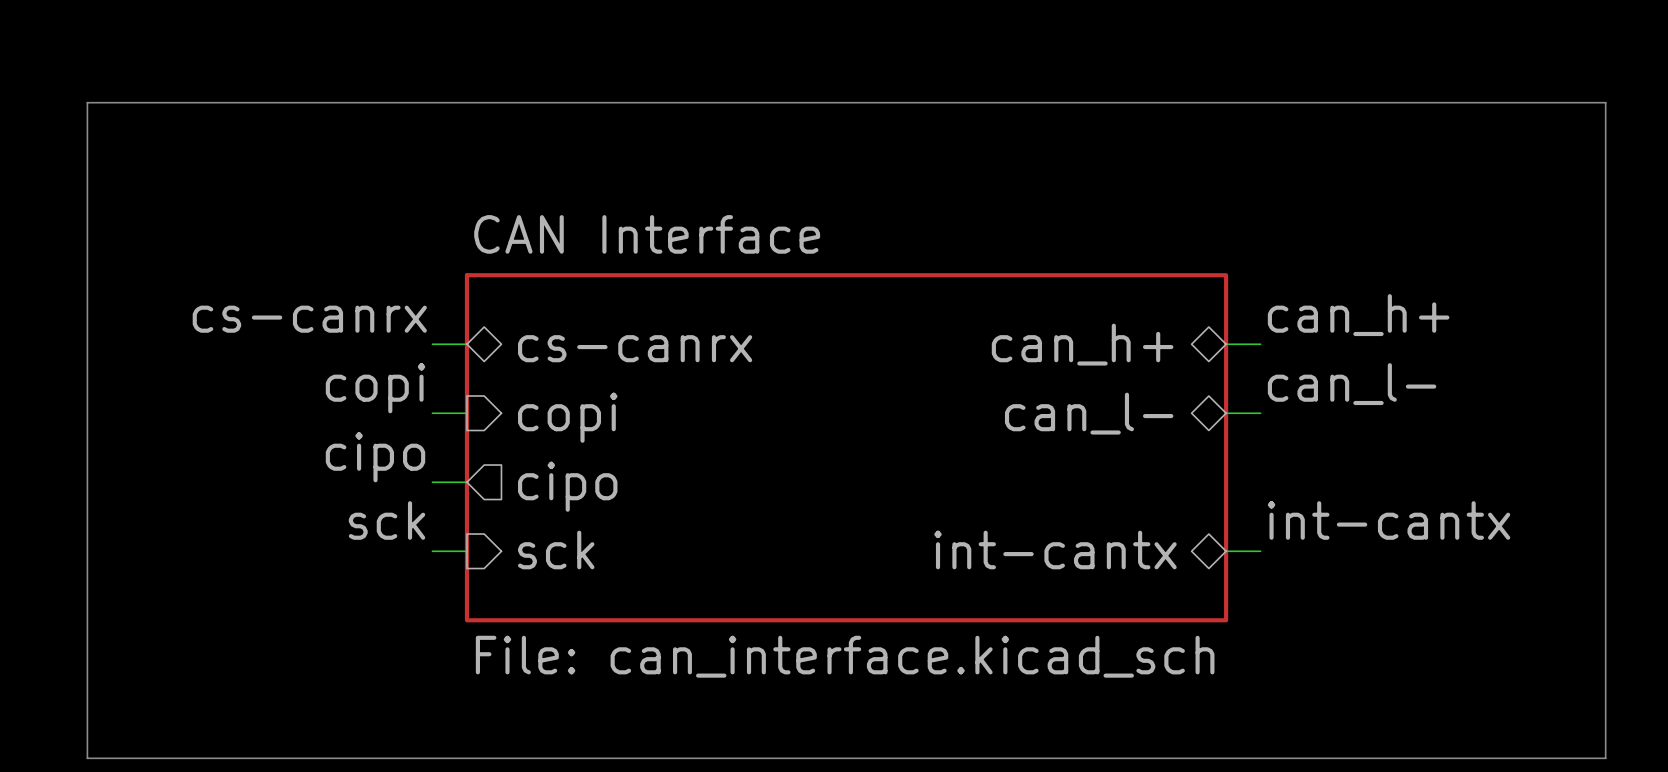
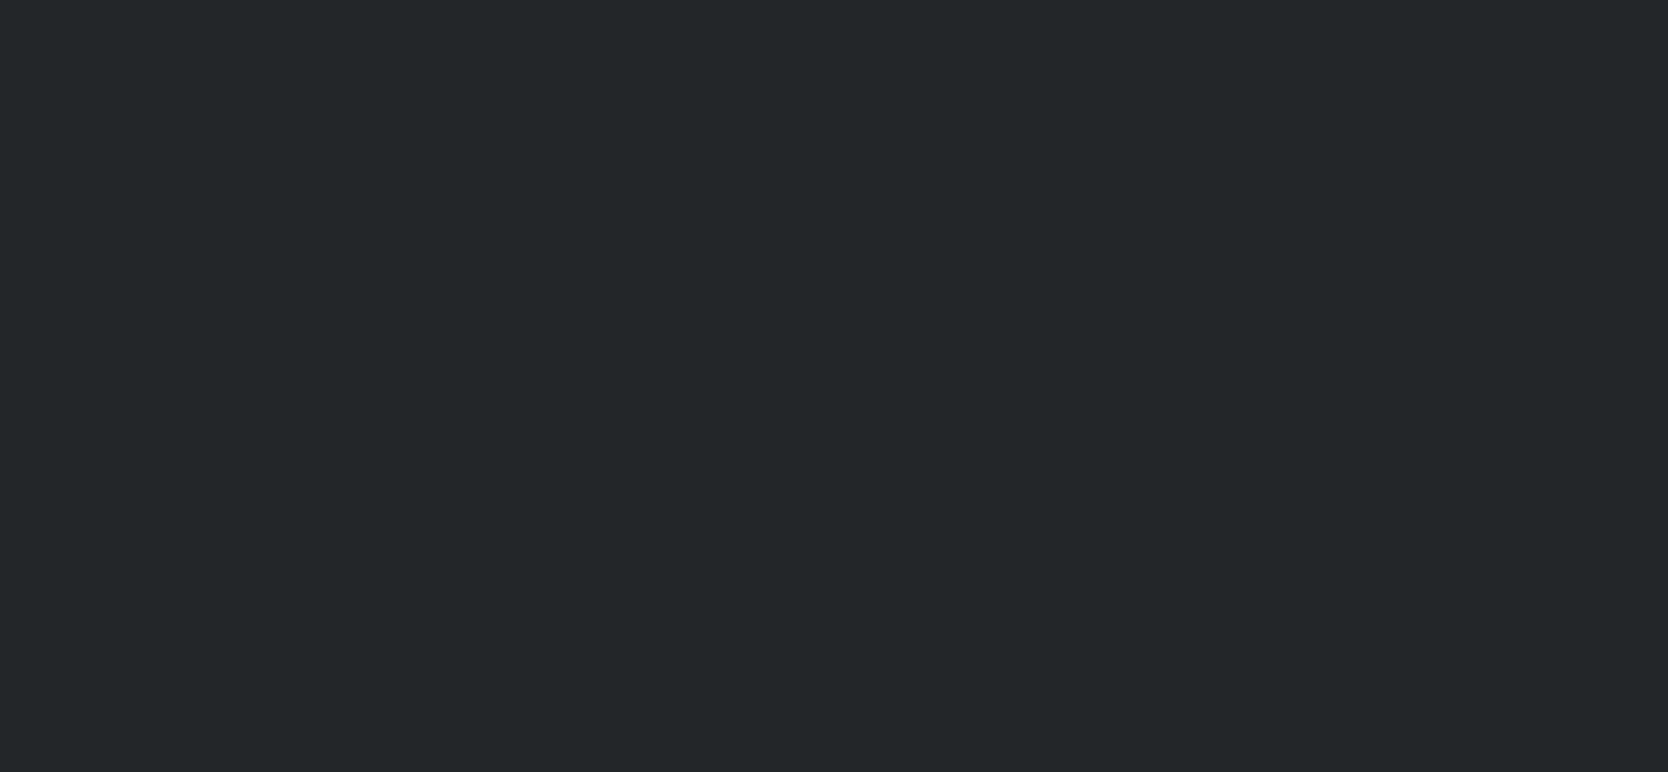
line: (87, 102) (1605, 102) (1605, 758) (87, 758) (87, 102) -> none
label: can_h+ (1358, 315) -> none
label: cs-canrx (309, 319) -> none
wire: (432, 344) (466, 344) -> none
sheet pin: can_h+ (1082, 344) -> none
wire: (1226, 344) (1260, 344) -> none
sheet pin: cs-canrx (635, 348) -> none
label: can_l- (1352, 384) -> none
label: copi (375, 388) -> none
wire: (432, 413) (466, 413) -> none
sheet pin: can_l- (1089, 413) -> none
wire: (1226, 413) (1260, 413) -> none
sheet pin: copi (567, 417) -> none
sheet CAN Interface: File: can_interface.kicad_sch (846, 447) -> none
label: cipo (375, 457) -> none
wire: (432, 482) (466, 482) -> none
sheet pin: cipo (567, 486) -> none
label: sck (387, 520) -> none
label: int-cantx (1389, 520) -> none
sheet pin: sck (556, 549) -> none
sheet pin: int-cantx (1055, 549) -> none
wire: (432, 551) (466, 551) -> none
wire: (1226, 551) (1260, 551) -> none

